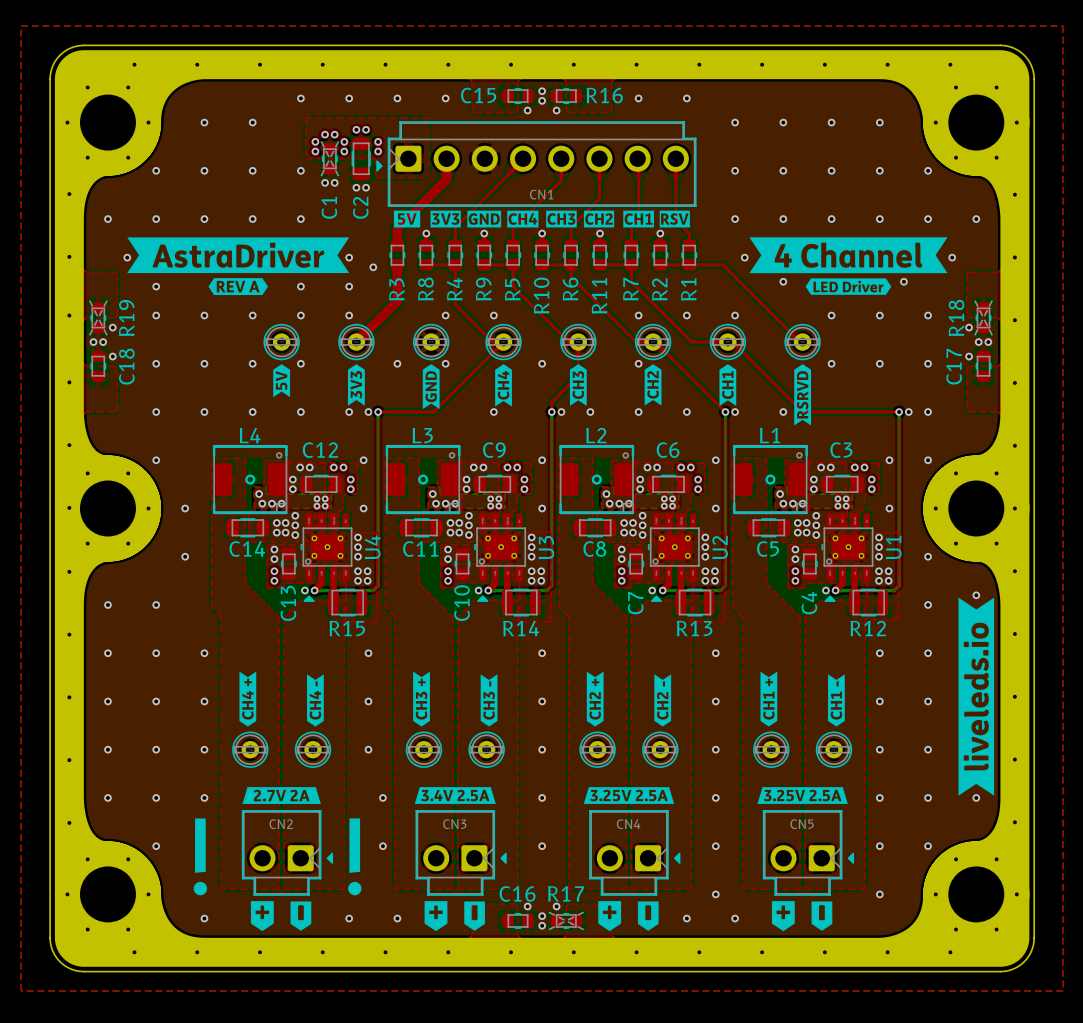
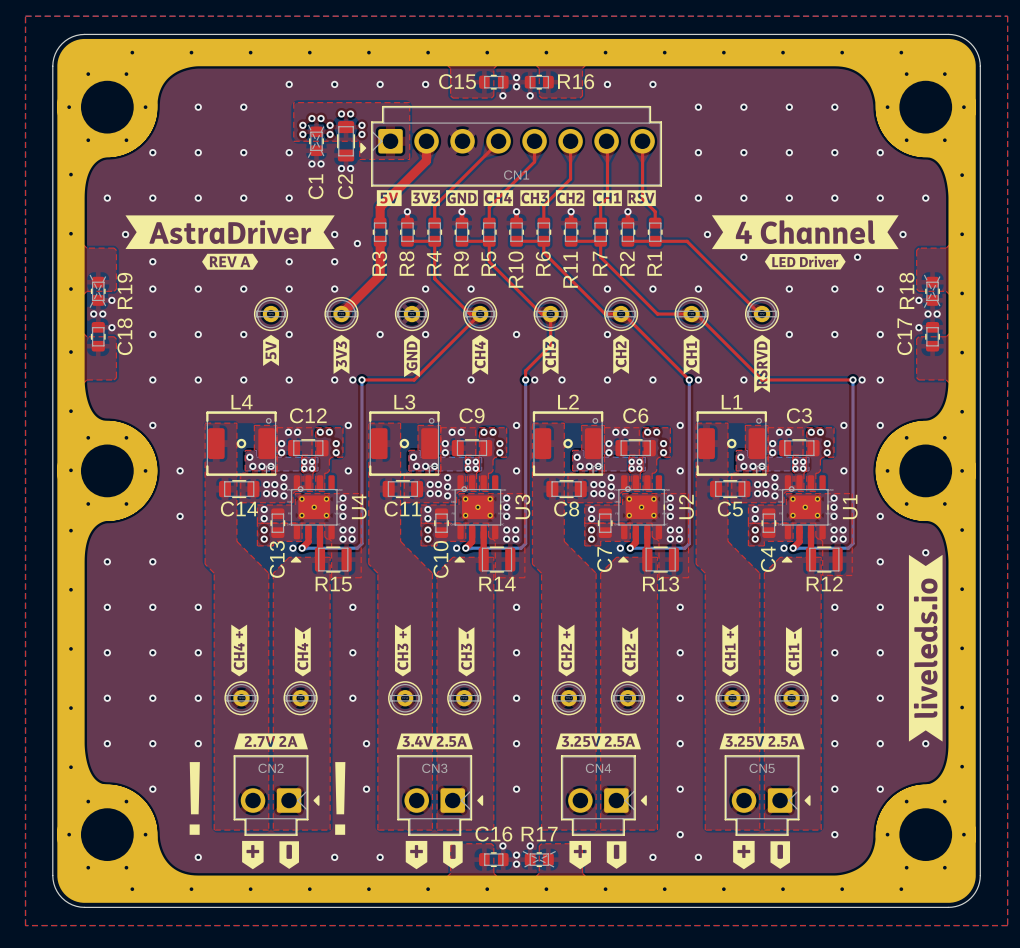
U4 footprint: [300, 513, 353, 602] -> [290, 475, 338, 563]
U3 footprint: [474, 513, 526, 602] -> [454, 475, 502, 563]
U2 footprint: [647, 513, 700, 602] -> [618, 475, 666, 563]
U1 footprint: [821, 513, 874, 602] -> [781, 475, 829, 563]

